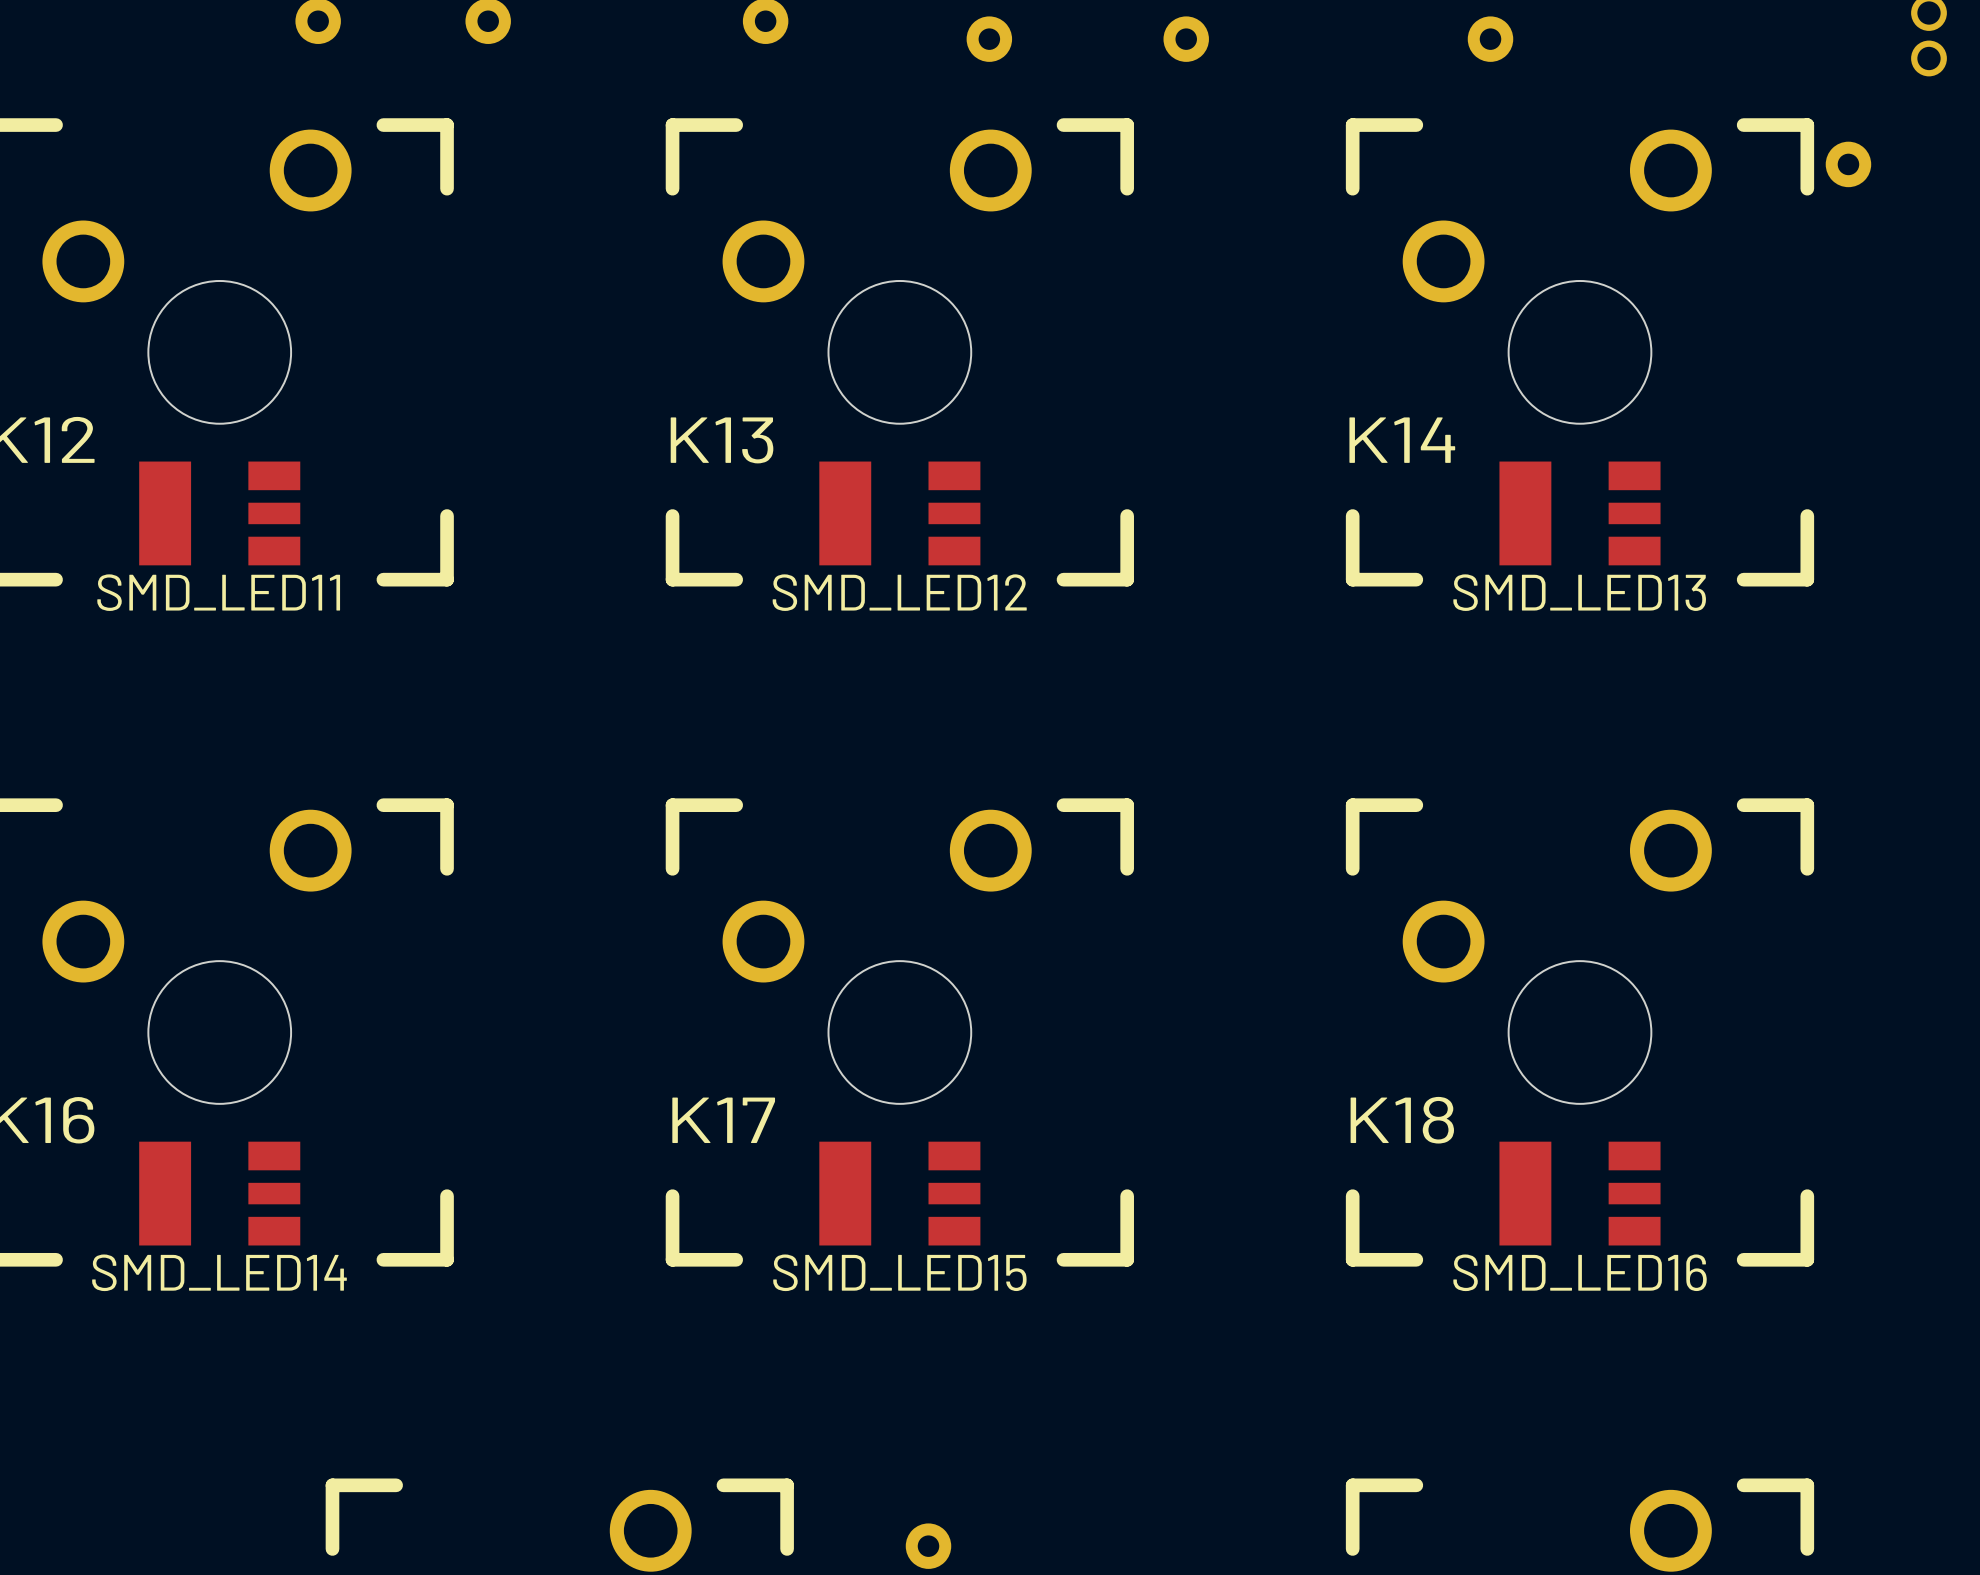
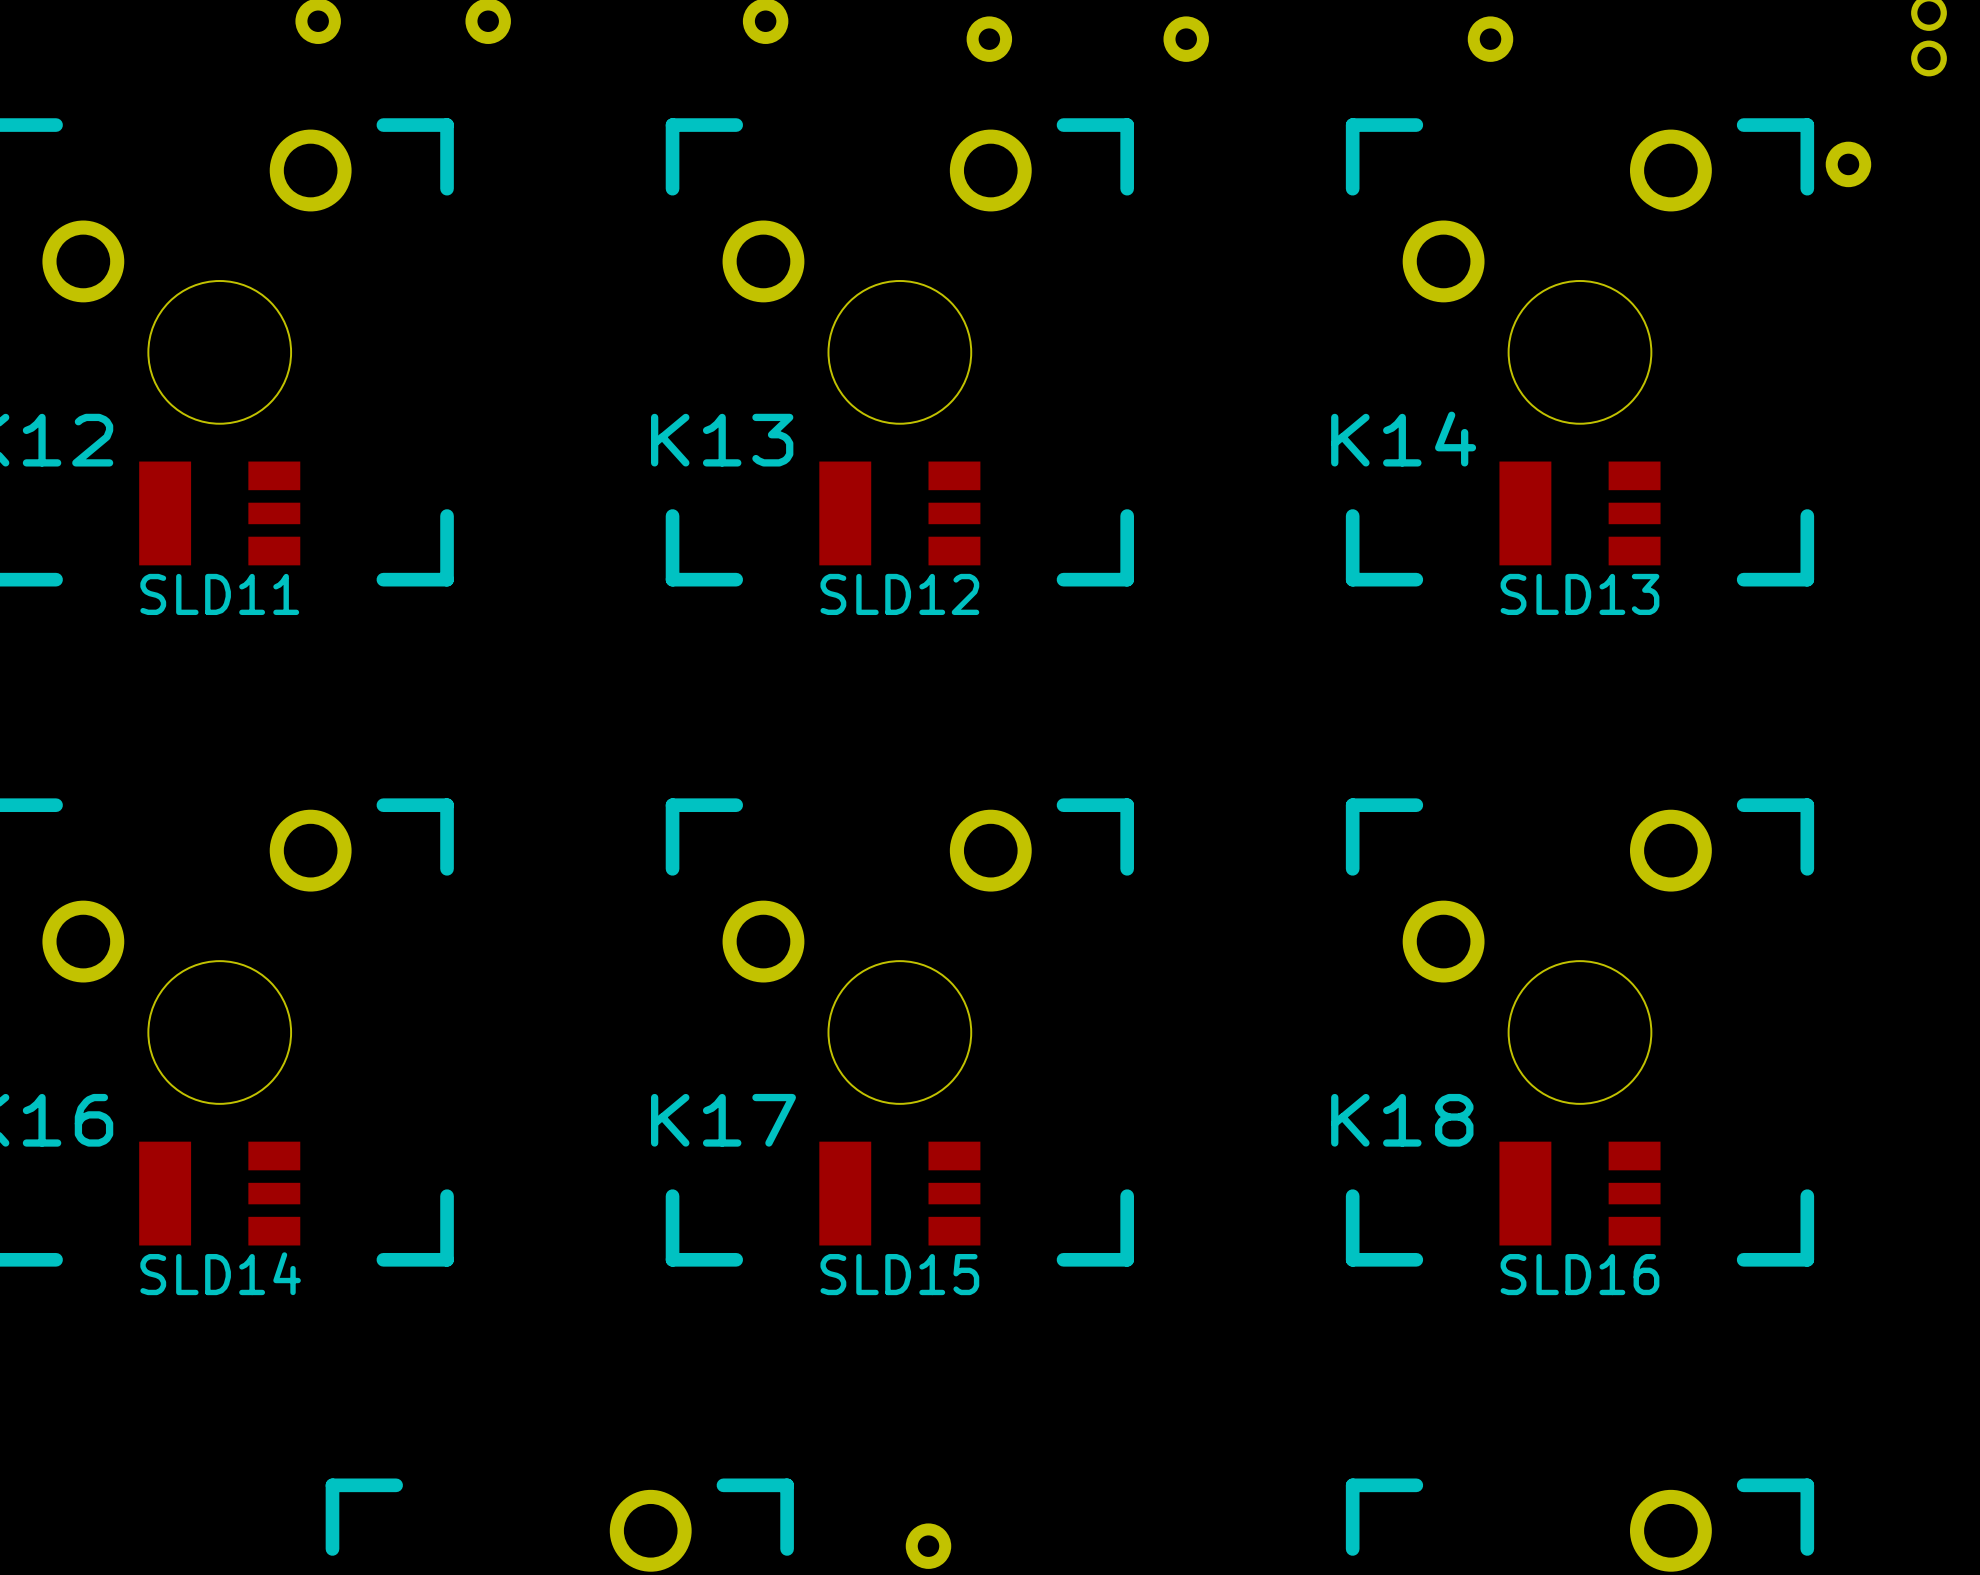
SMD_LED11 name: SMD_LED11 (218, 592) -> SLD11 (219, 594)
SMD_LED12 name: SMD_LED12 (899, 592) -> SLD12 (899, 594)
SMD_LED13 name: SMD_LED13 (1579, 592) -> SLD13 (1579, 594)
SMD_LED14 name: SMD_LED14 (219, 1272) -> SLD14 (220, 1273)
SMD_LED15 name: SMD_LED15 (899, 1272) -> SLD15 (899, 1274)
SMD_LED16 name: SMD_LED16 (1580, 1272) -> SLD16 (1579, 1274)

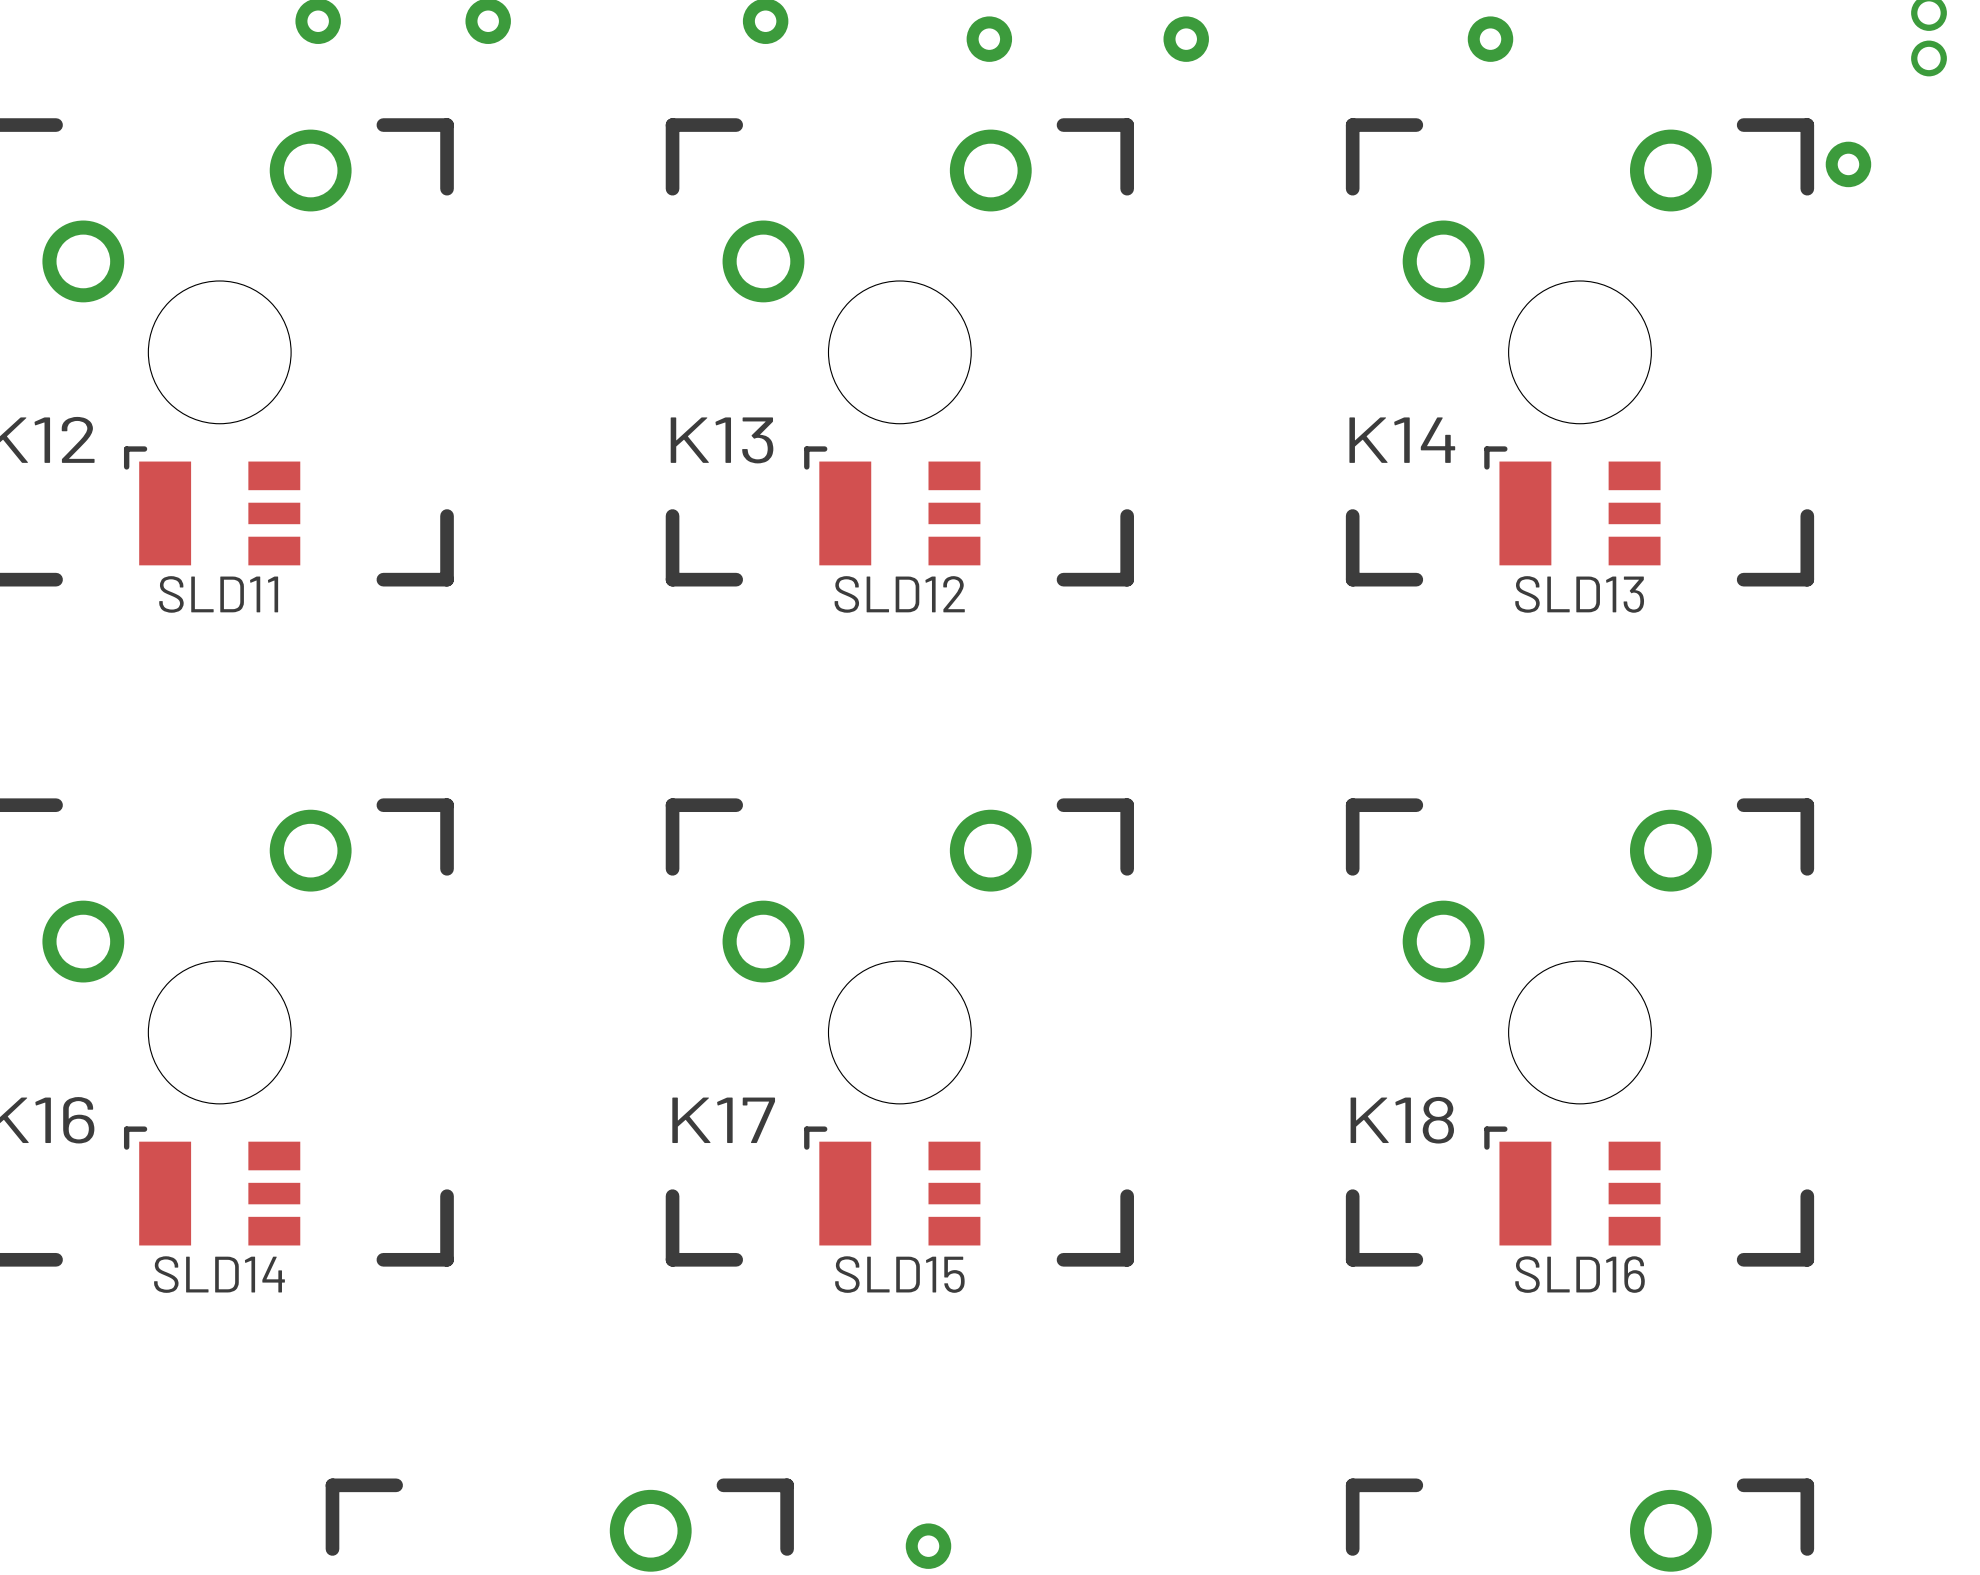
SLD11 footprint: [139, 461, 301, 566] -> [123, 446, 301, 566]
SLD12 footprint: [819, 461, 981, 566] -> [804, 446, 981, 566]
SLD13 footprint: [1499, 461, 1661, 566] -> [1484, 446, 1661, 566]
SLD14 footprint: [139, 1141, 301, 1246] -> [123, 1126, 301, 1246]
SLD15 footprint: [819, 1141, 981, 1246] -> [804, 1126, 981, 1246]
SLD16 footprint: [1499, 1141, 1661, 1246] -> [1484, 1126, 1661, 1246]

